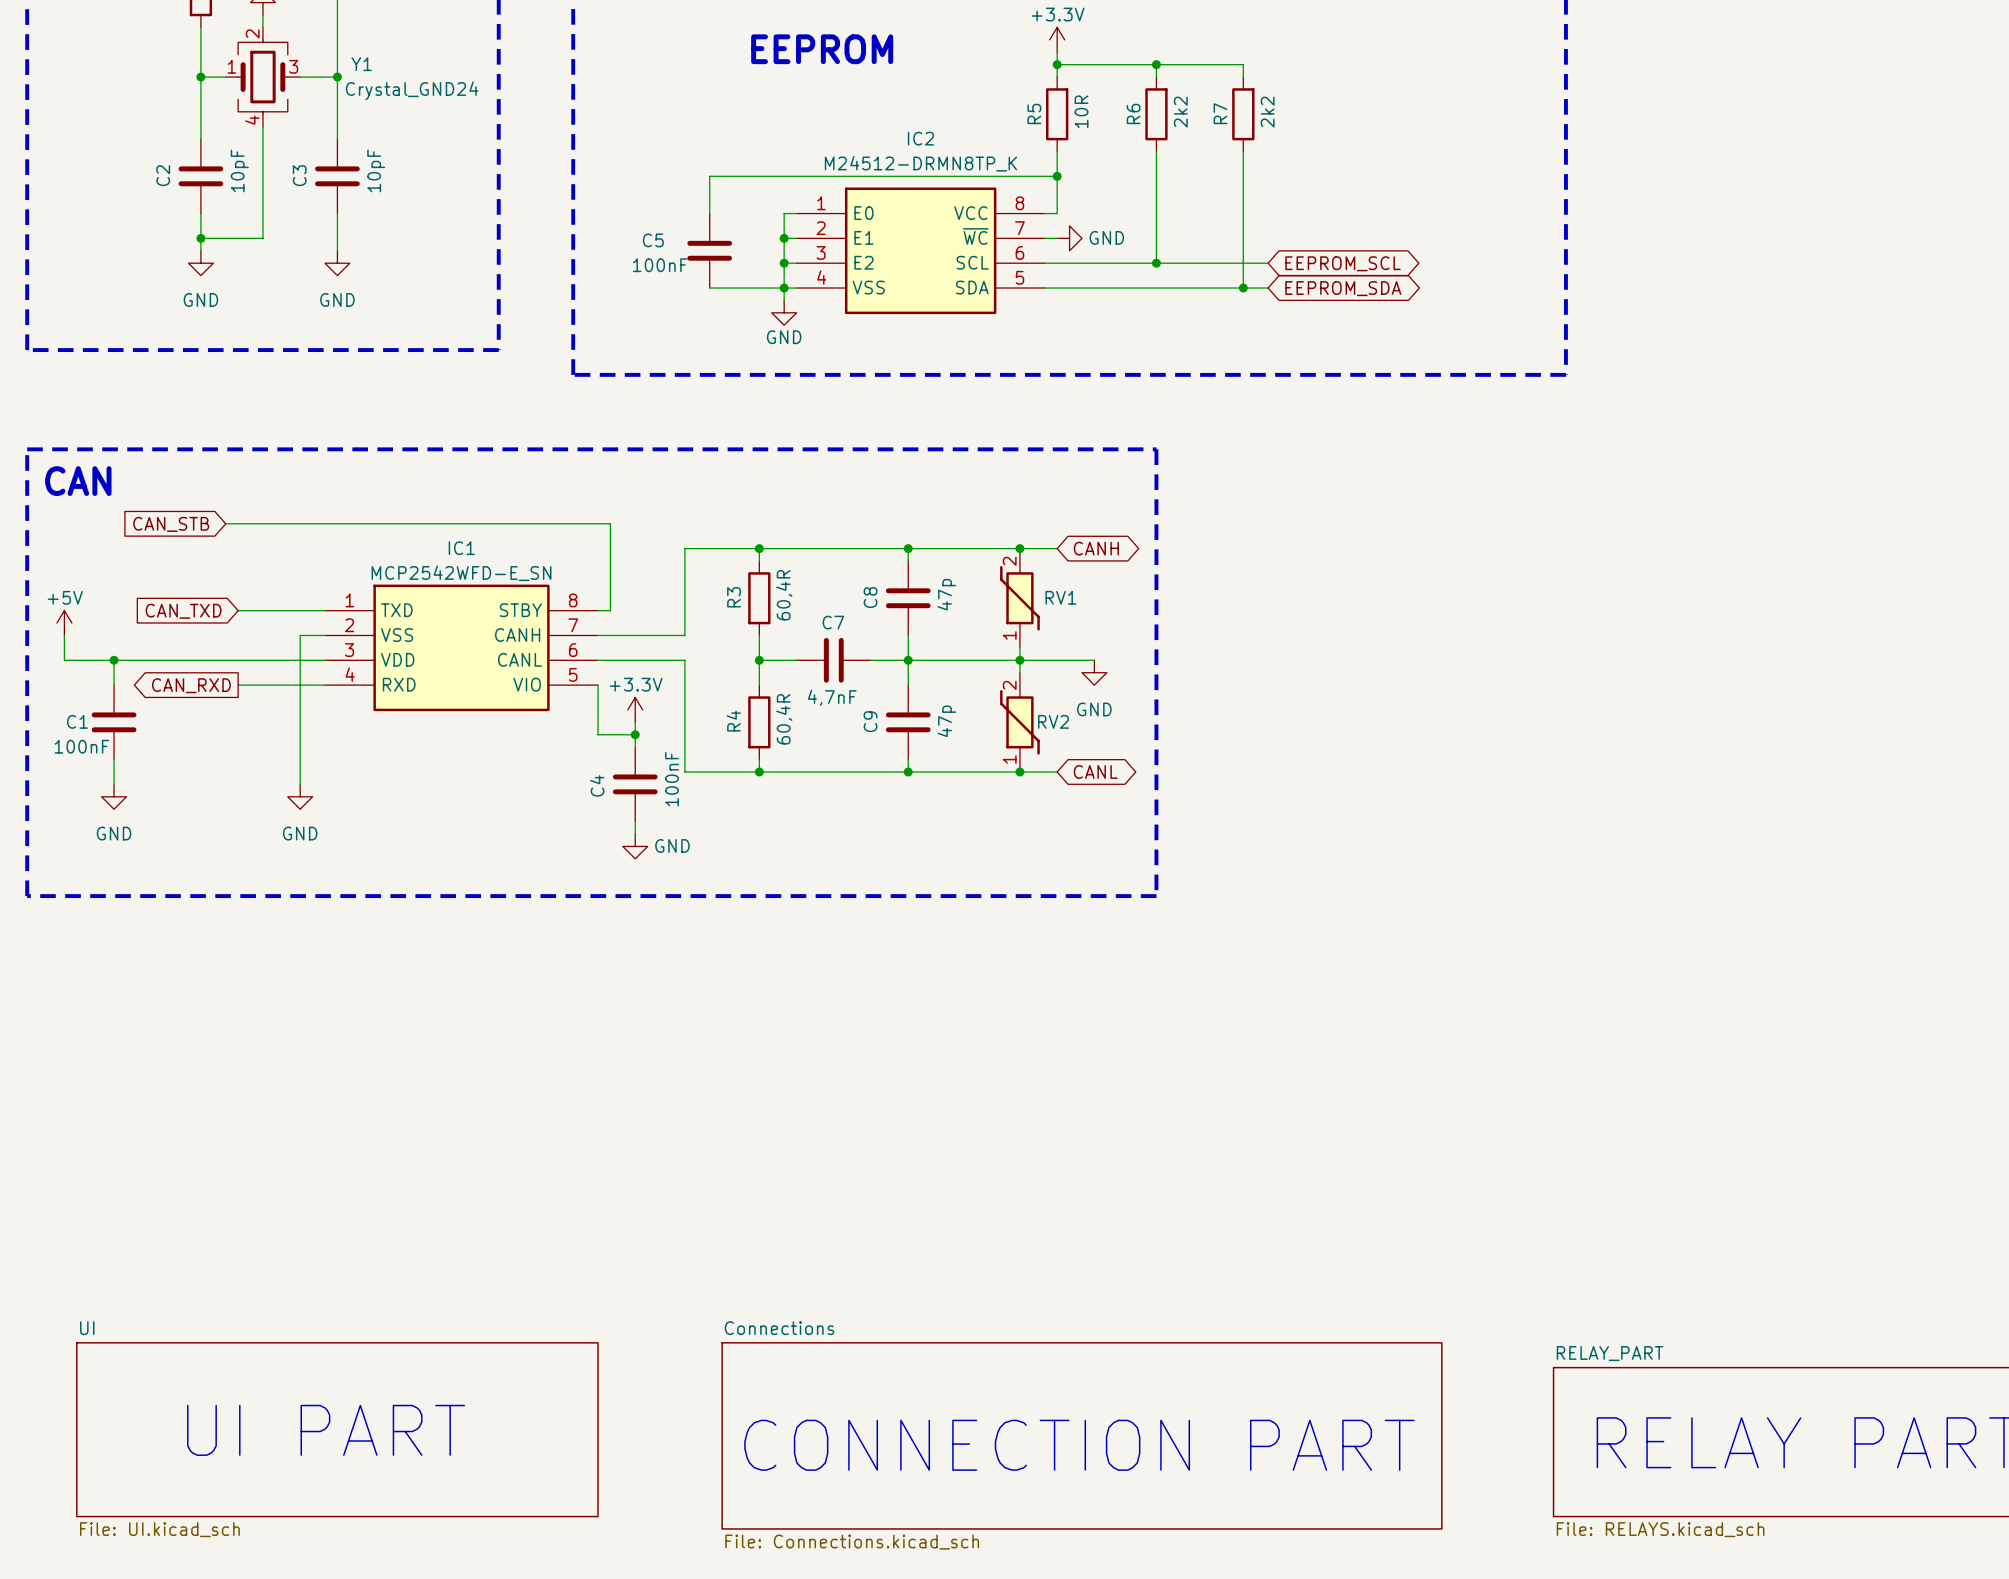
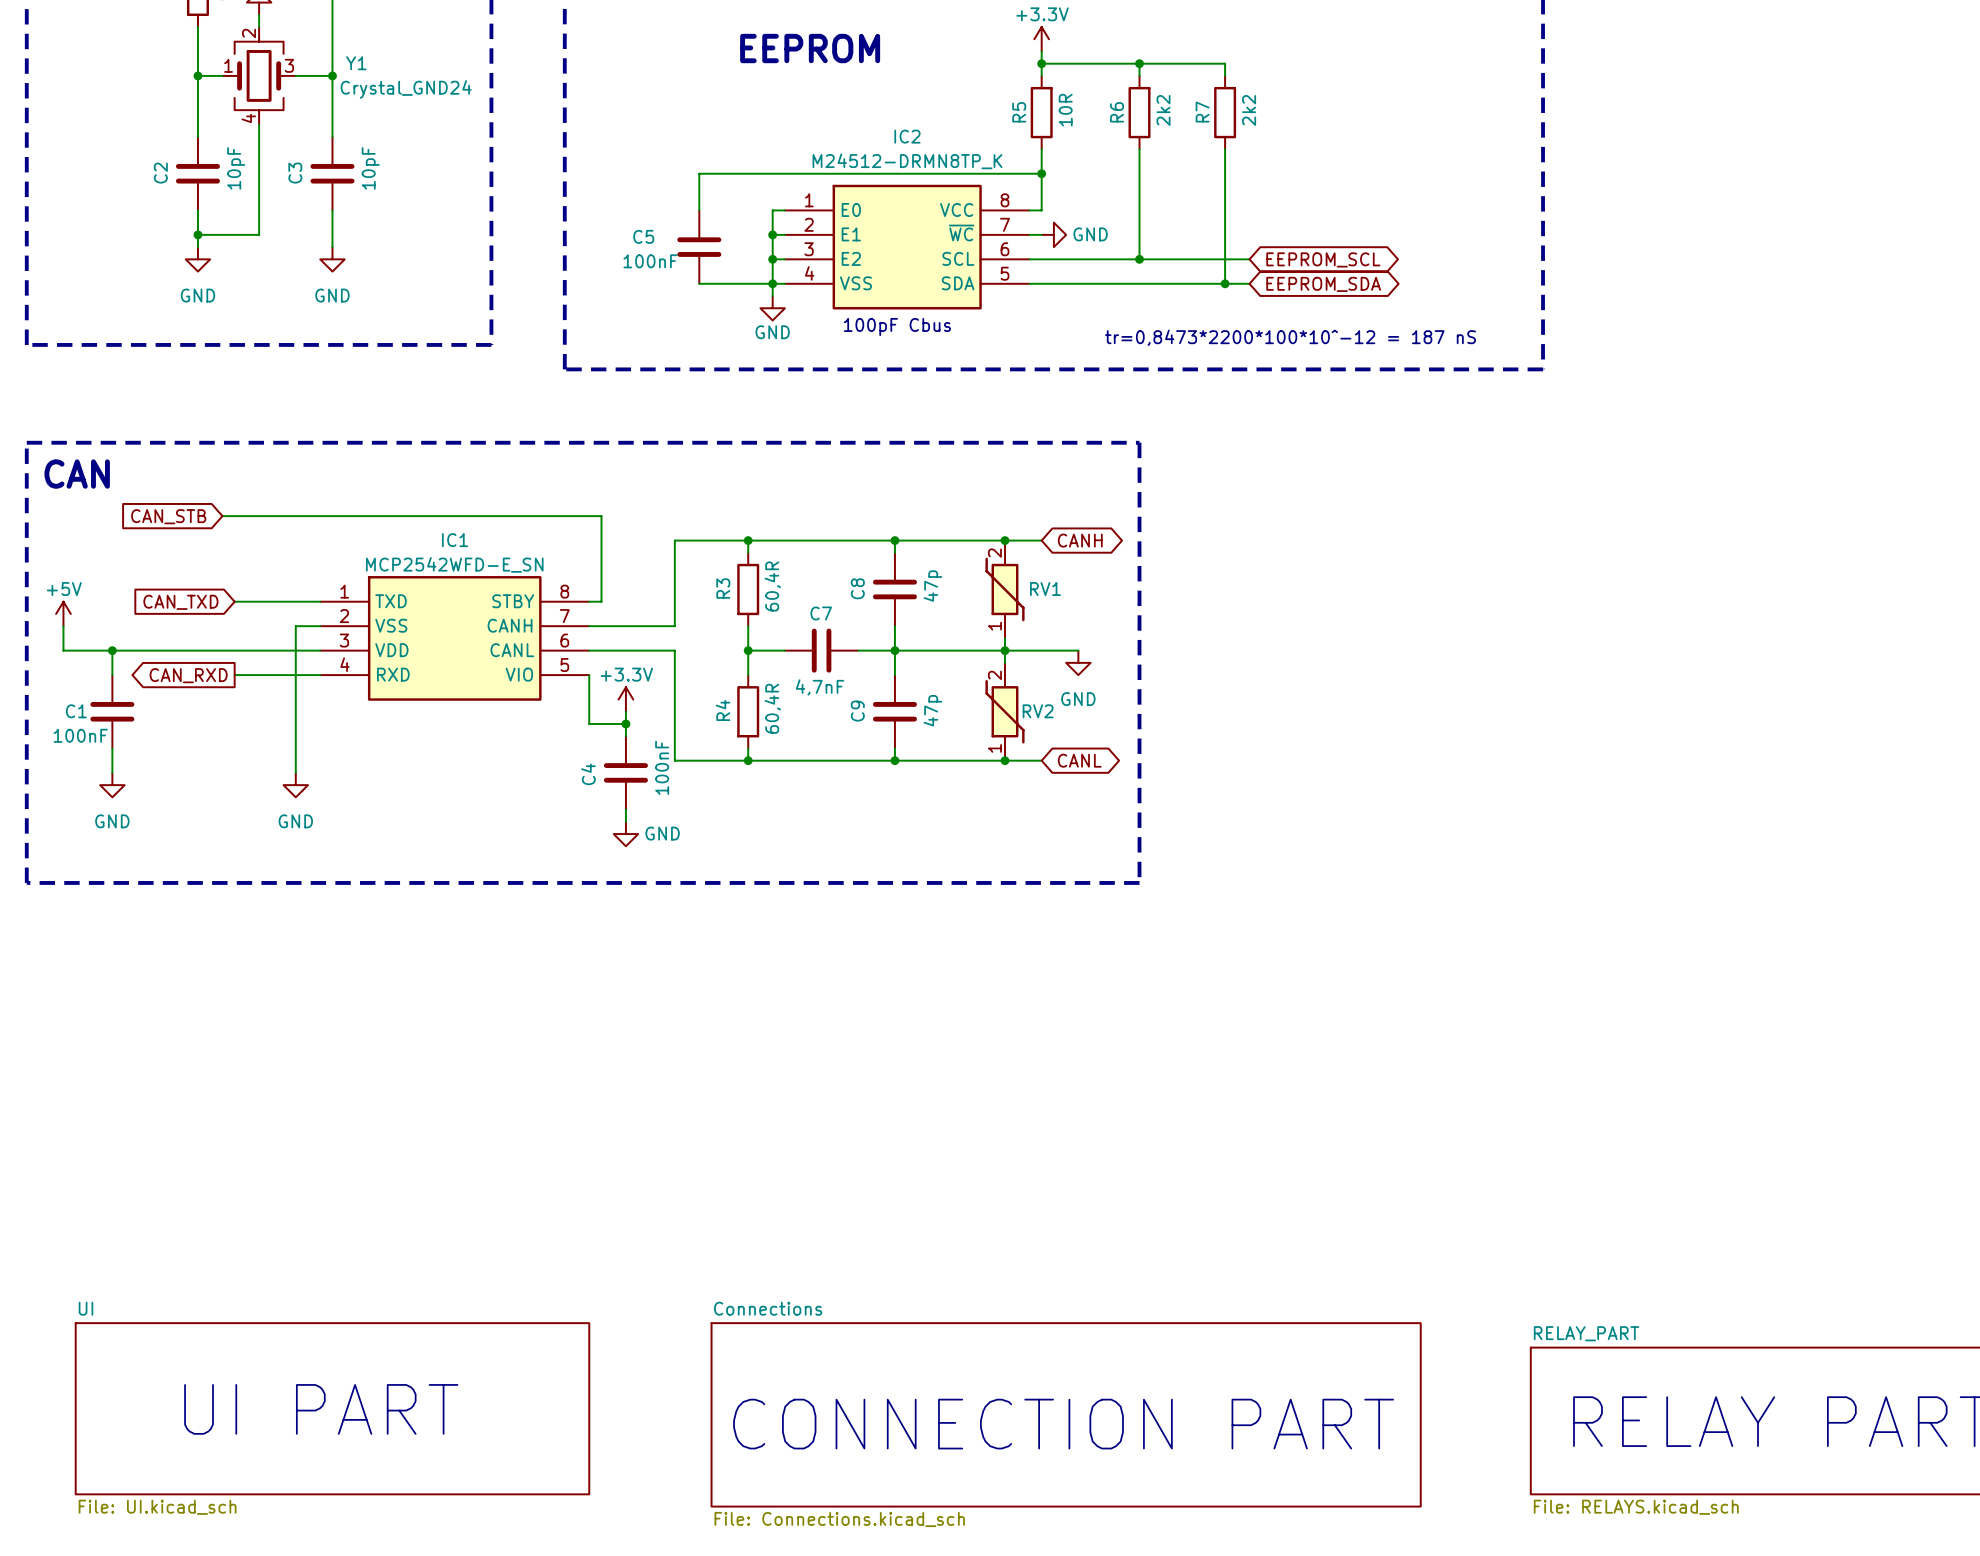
text: none -> 100pF Cbus (897, 326)
text: none -> tr=0,8473*2200*100*10^-12 = 187 nS (1290, 337)

